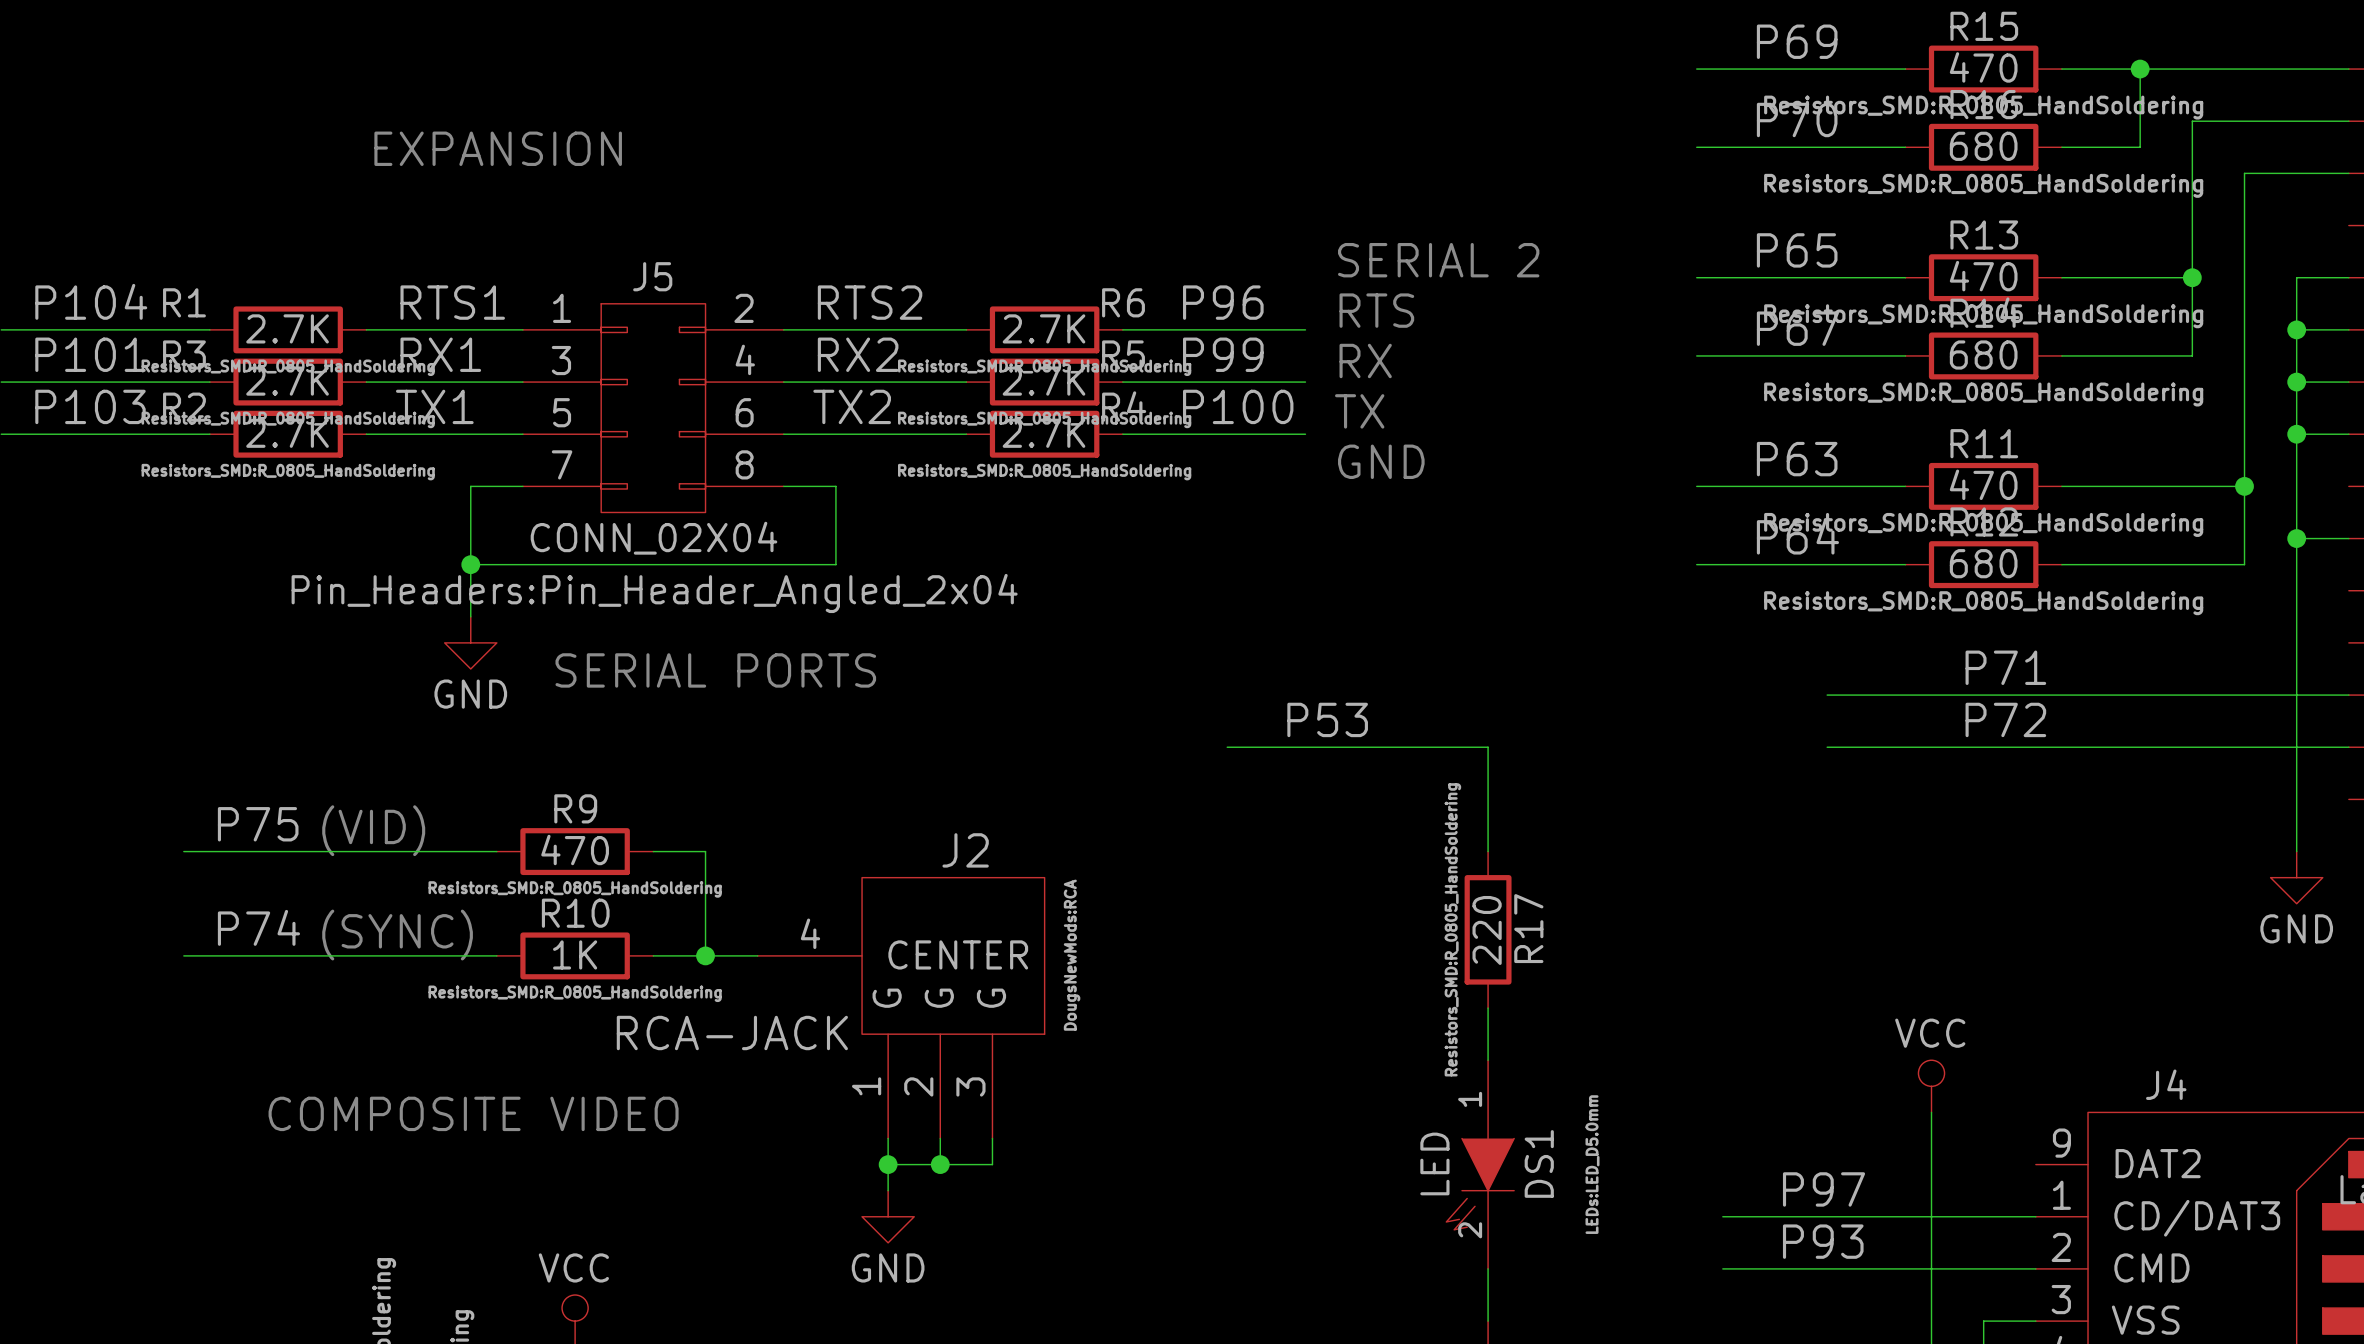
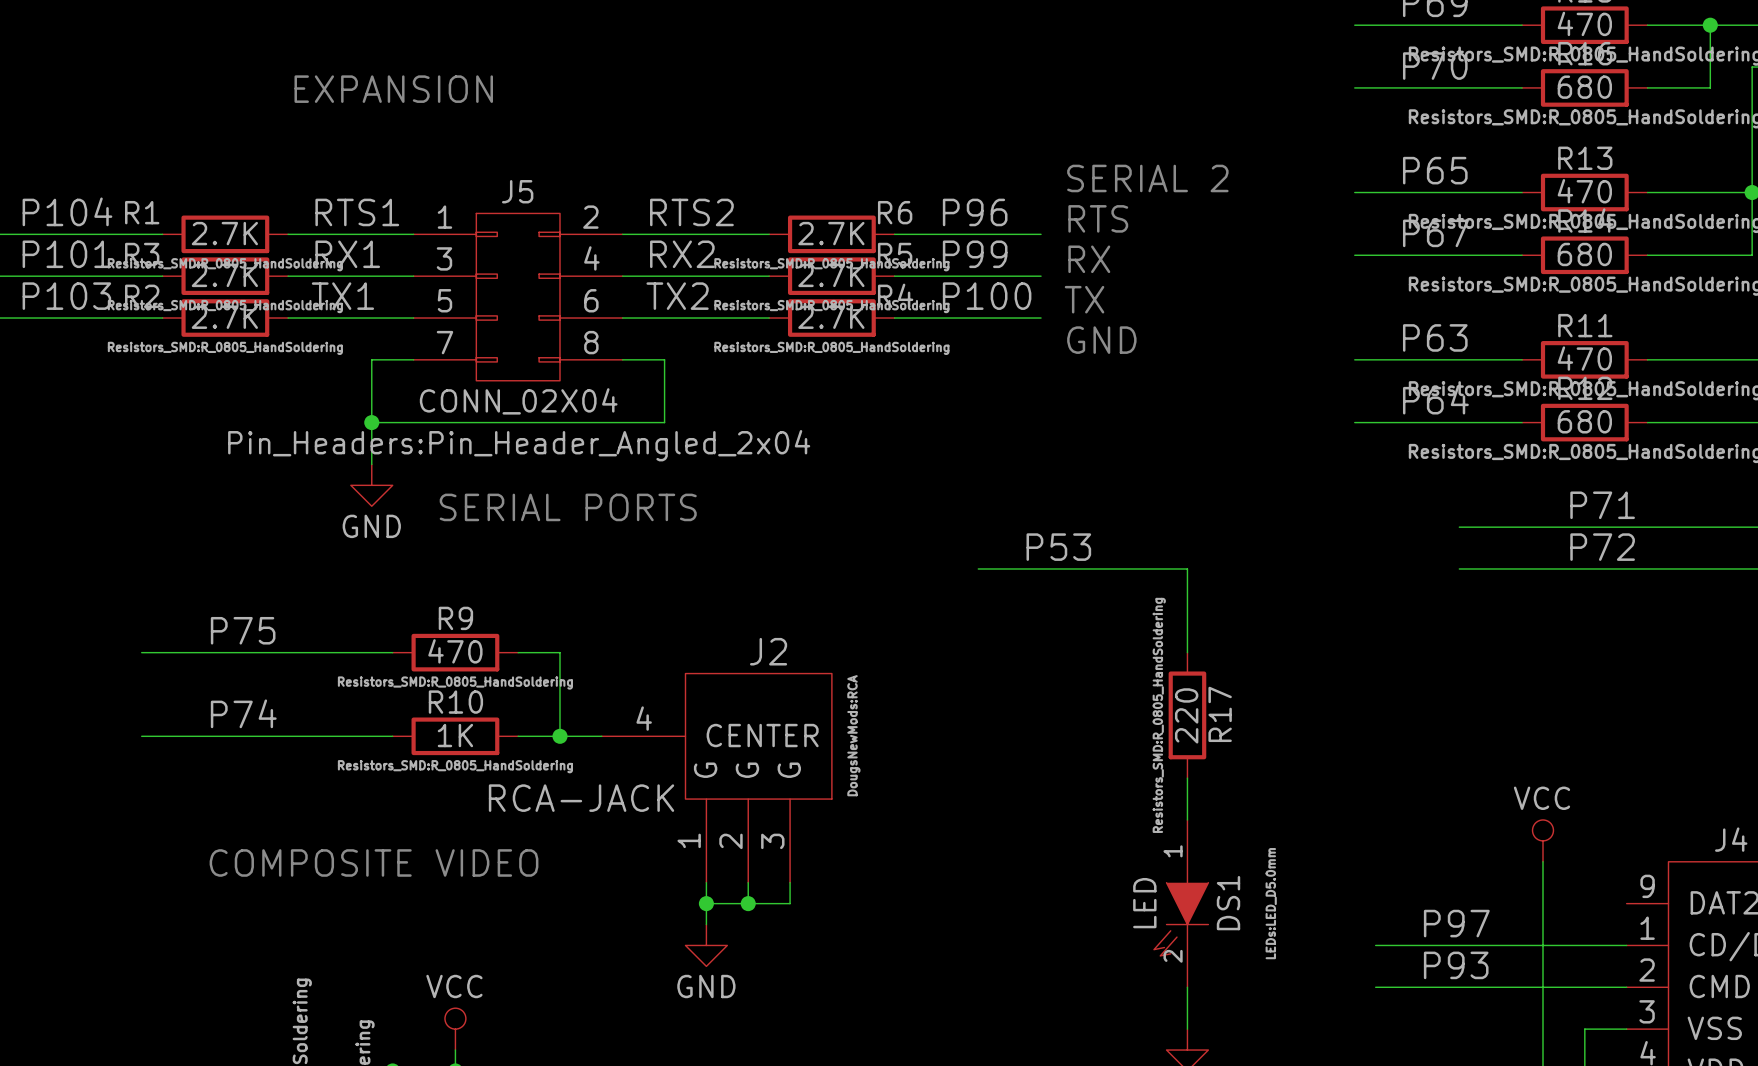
label position: P75 (258, 824) -> P75 (243, 630)
text: (VID) (373, 830) -> none
label position: P74 (258, 927) -> P74 (243, 713)
text: (SYNC) (397, 935) -> none

